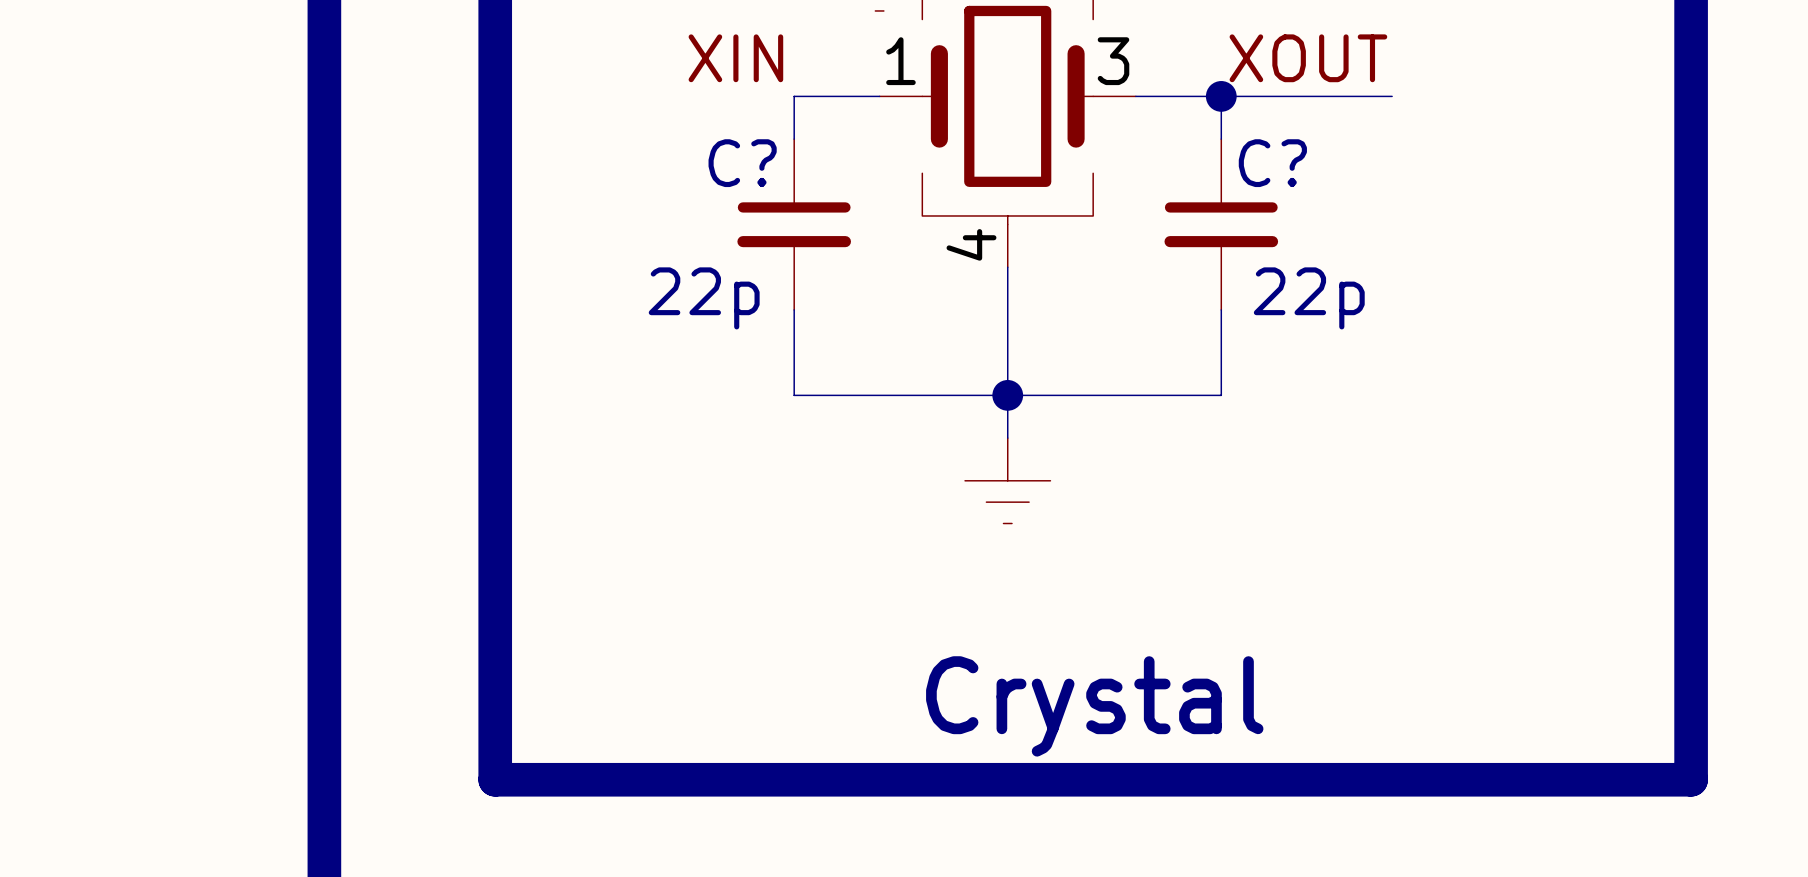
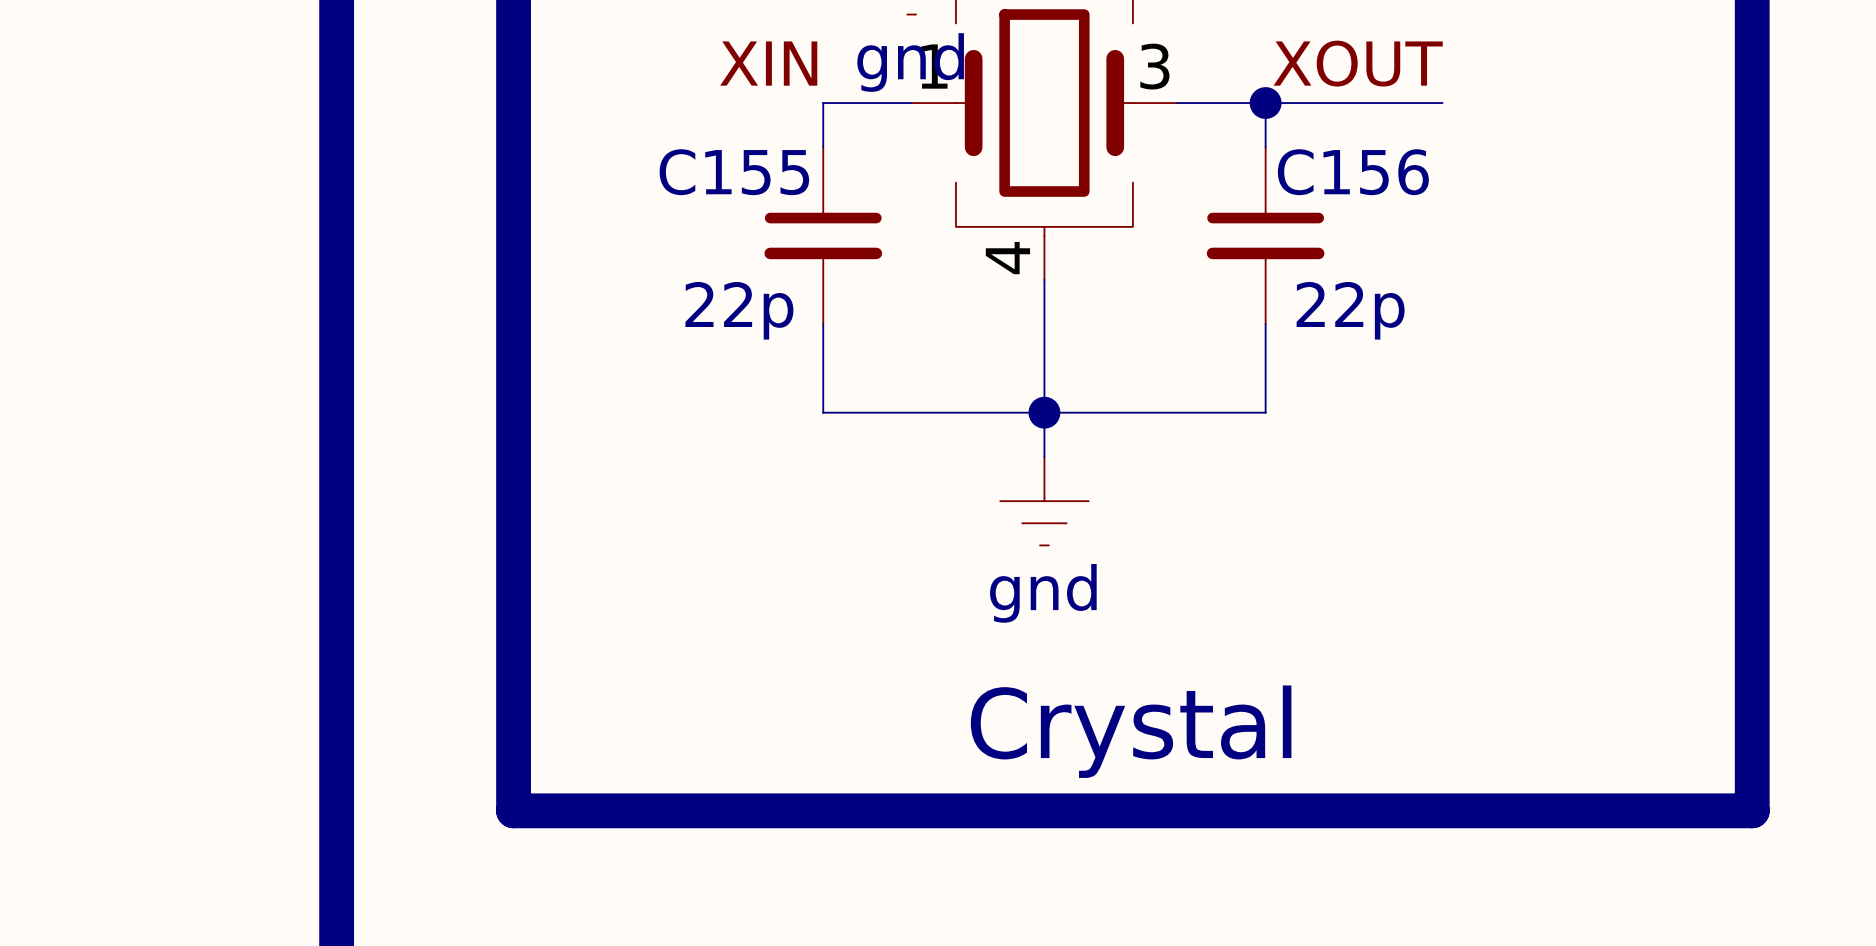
power symbol text: none -> gnd (910, 62)
C? name: C? (742, 163) -> C155 (734, 172)
C? name: C? (1272, 163) -> C156 (1353, 172)
power symbol text: none -> gnd (1043, 593)

